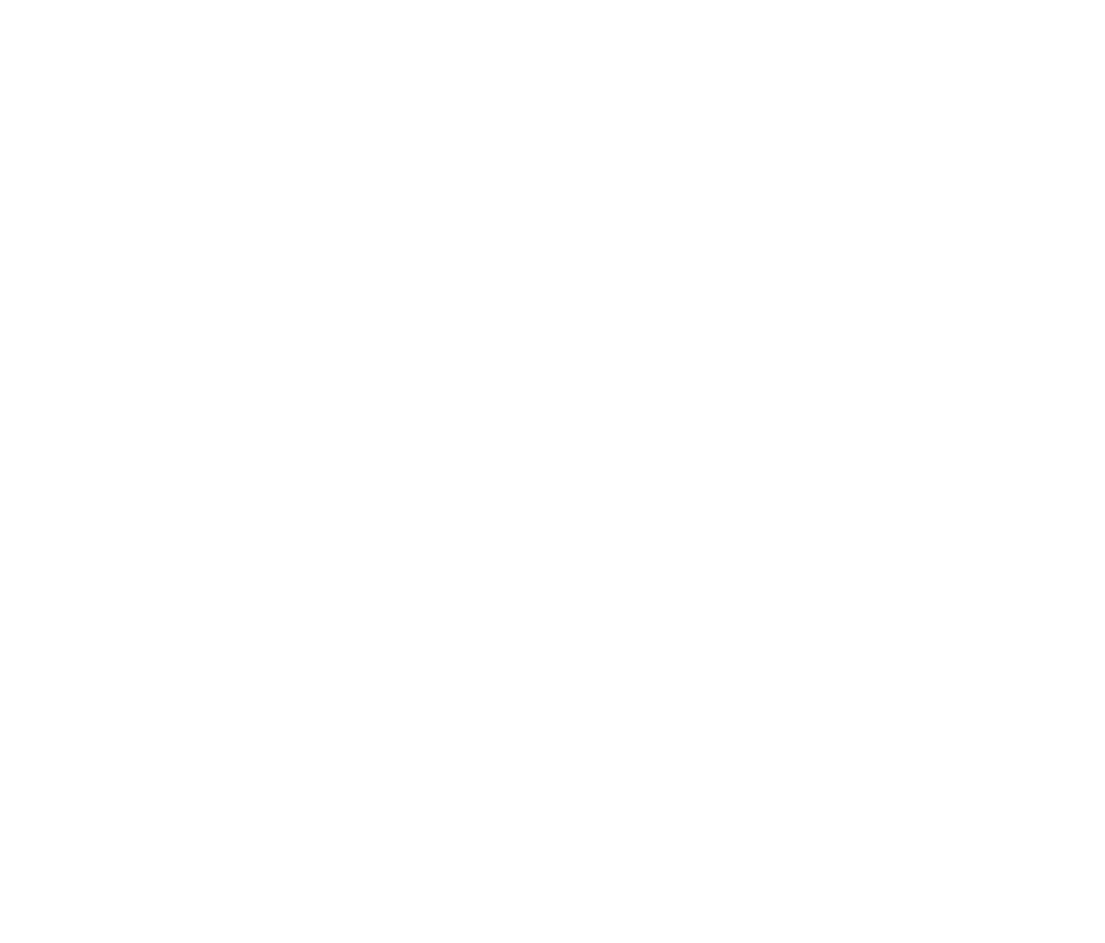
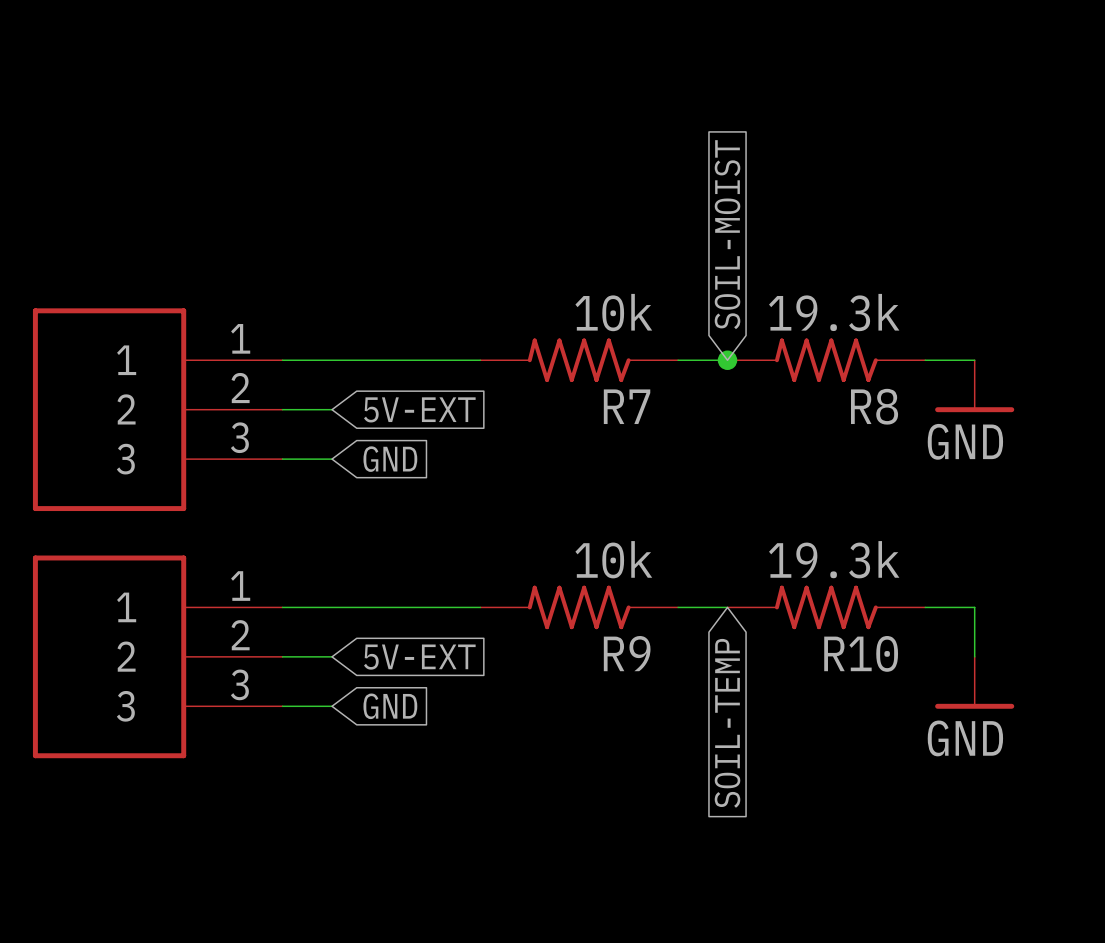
global label: none -> SOIL-MOIST (727, 234)
wire: none -> (282, 360) (480, 360)
R7: none -> 10k (579, 360)
wire: none -> (678, 360) (727, 360)
junction: none -> (727, 360)
R8: none -> 19.3k (826, 360)
wire: none -> (925, 360) (974, 360)
power symbol: none -> GND (974, 386)
part: none -> (157, 409)
wire: none -> (282, 409) (332, 409)
global label: none -> 5V-EXT (419, 409)
wire: none -> (282, 459) (332, 459)
global label: none -> GND (390, 459)
wire: none -> (282, 607) (480, 607)
R9: none -> 10k (579, 607)
wire: none -> (678, 607) (727, 607)
R10: none -> 19.3k (826, 607)
wire: none -> (925, 607) (974, 607) (974, 656)
part: none -> (157, 656)
wire: none -> (282, 656) (332, 656)
global label: none -> 5V-EXT (419, 657)
power symbol: none -> GND (974, 682)
wire: none -> (282, 706) (332, 706)
global label: none -> GND (390, 706)
global label: none -> SOIL-TEMP (727, 723)

